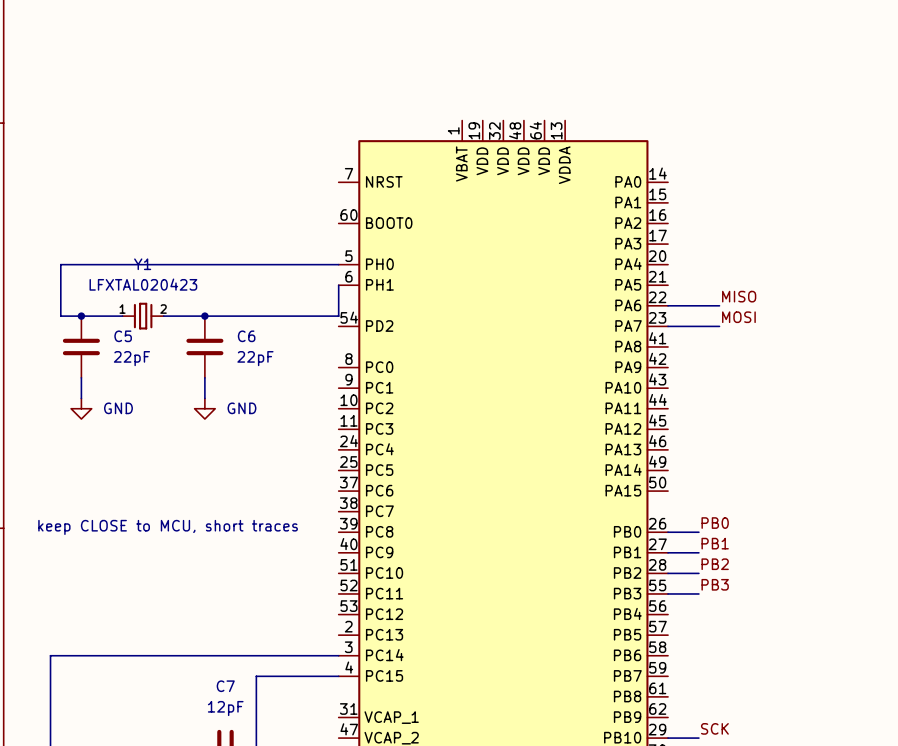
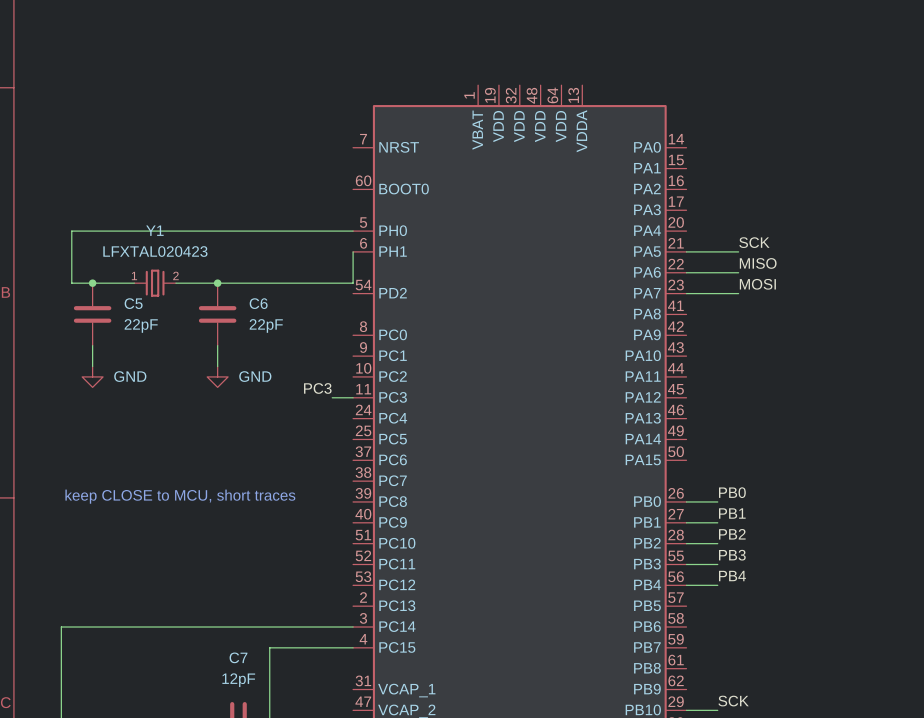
label: none -> SCK (754, 242)
wire: none -> (686, 251) (738, 251)
label: none -> PC3 (317, 388)
wire: none -> (332, 397) (353, 397)
label: none -> PB4 (732, 576)
wire: none -> (686, 585) (717, 585)

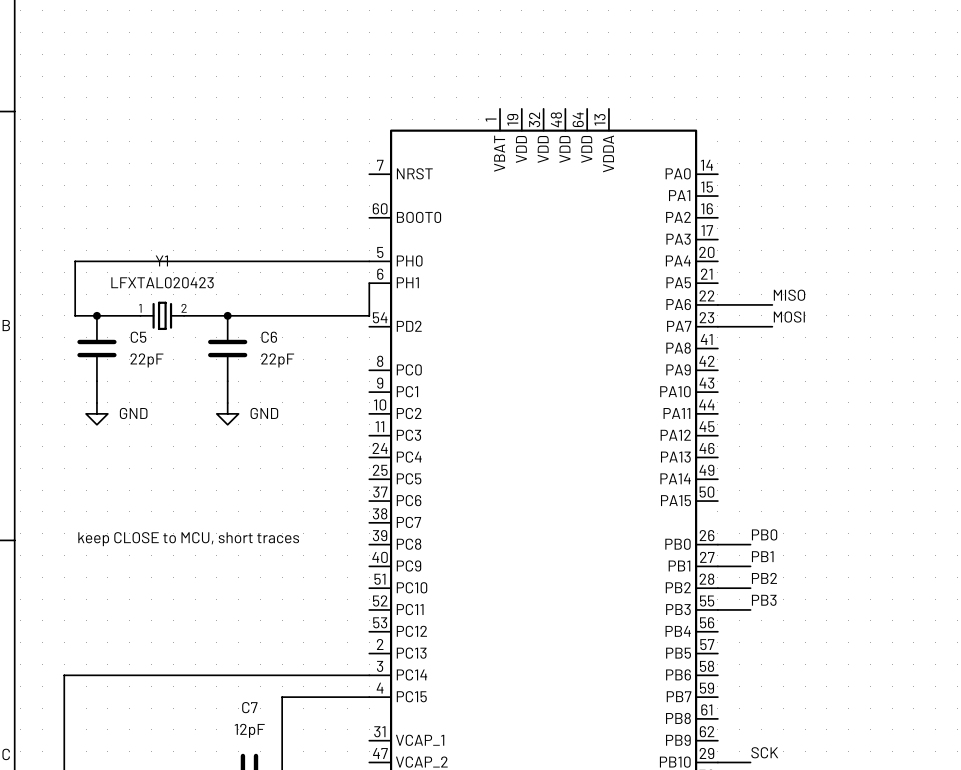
label: SCK (754, 242) -> none
wire: (686, 251) (738, 251) -> none
label: PC3 (317, 388) -> none
wire: (332, 397) (353, 397) -> none
label: PB4 (732, 576) -> none
wire: (686, 585) (717, 585) -> none

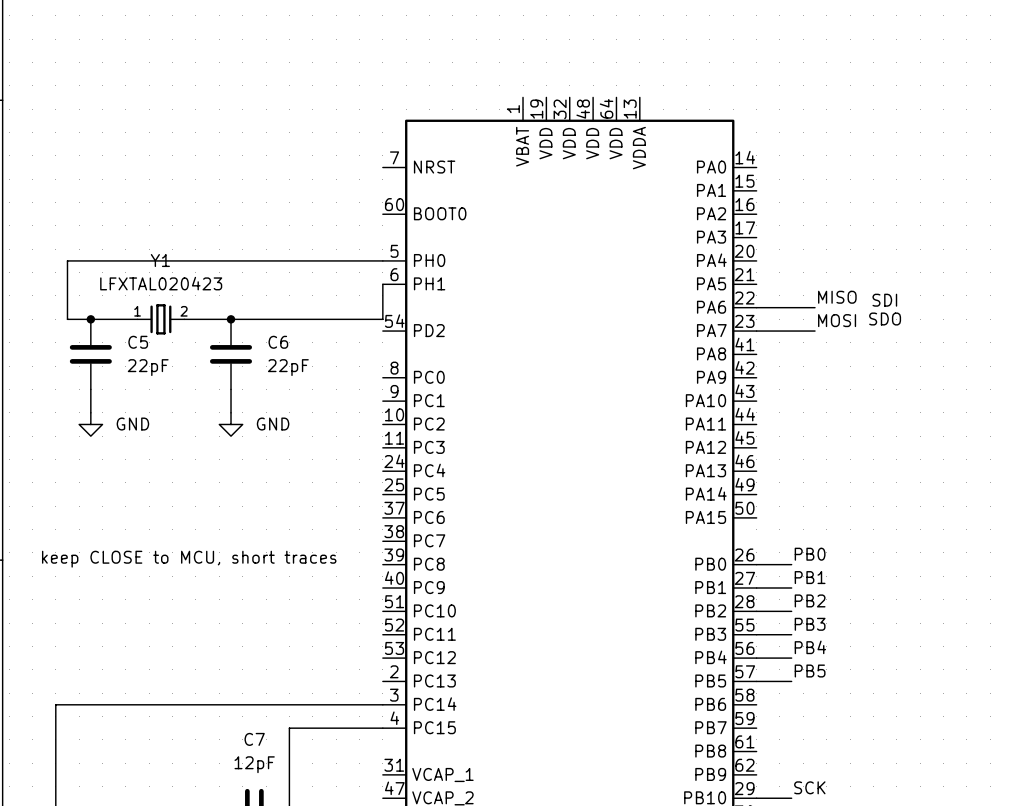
text: none -> SDI (884, 300)
text: none -> SDO (885, 319)
label: none -> PB4 (810, 647)
wire: none -> (756, 658) (791, 658)
label: none -> PB5 (810, 671)
wire: none -> (756, 681) (791, 681)

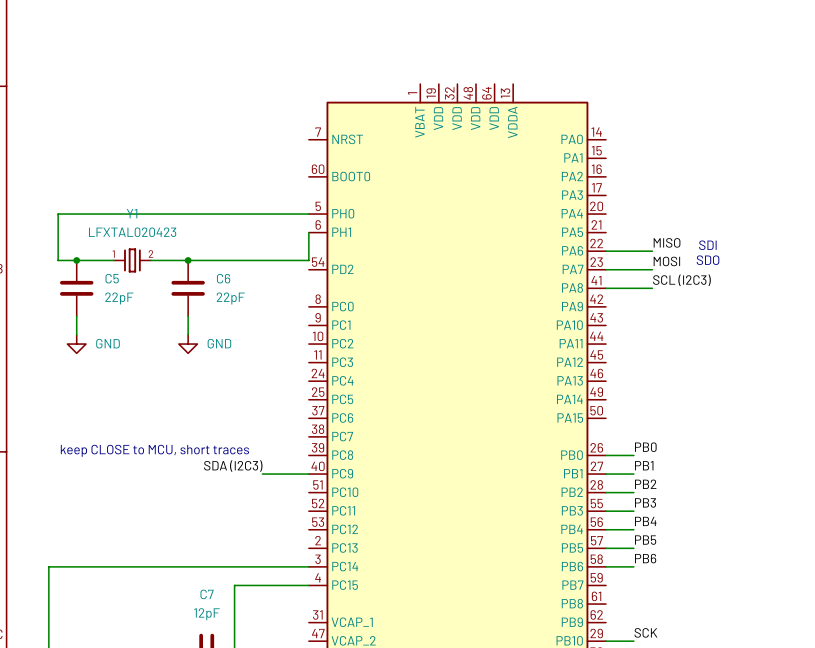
label: none -> SCL (I2C3) (681, 280)
wire: none -> (606, 288) (652, 288)
label: none -> SDA (I2C3) (233, 466)
wire: none -> (262, 474) (308, 474)
label: none -> PB6 (645, 558)
wire: none -> (606, 566) (633, 566)

